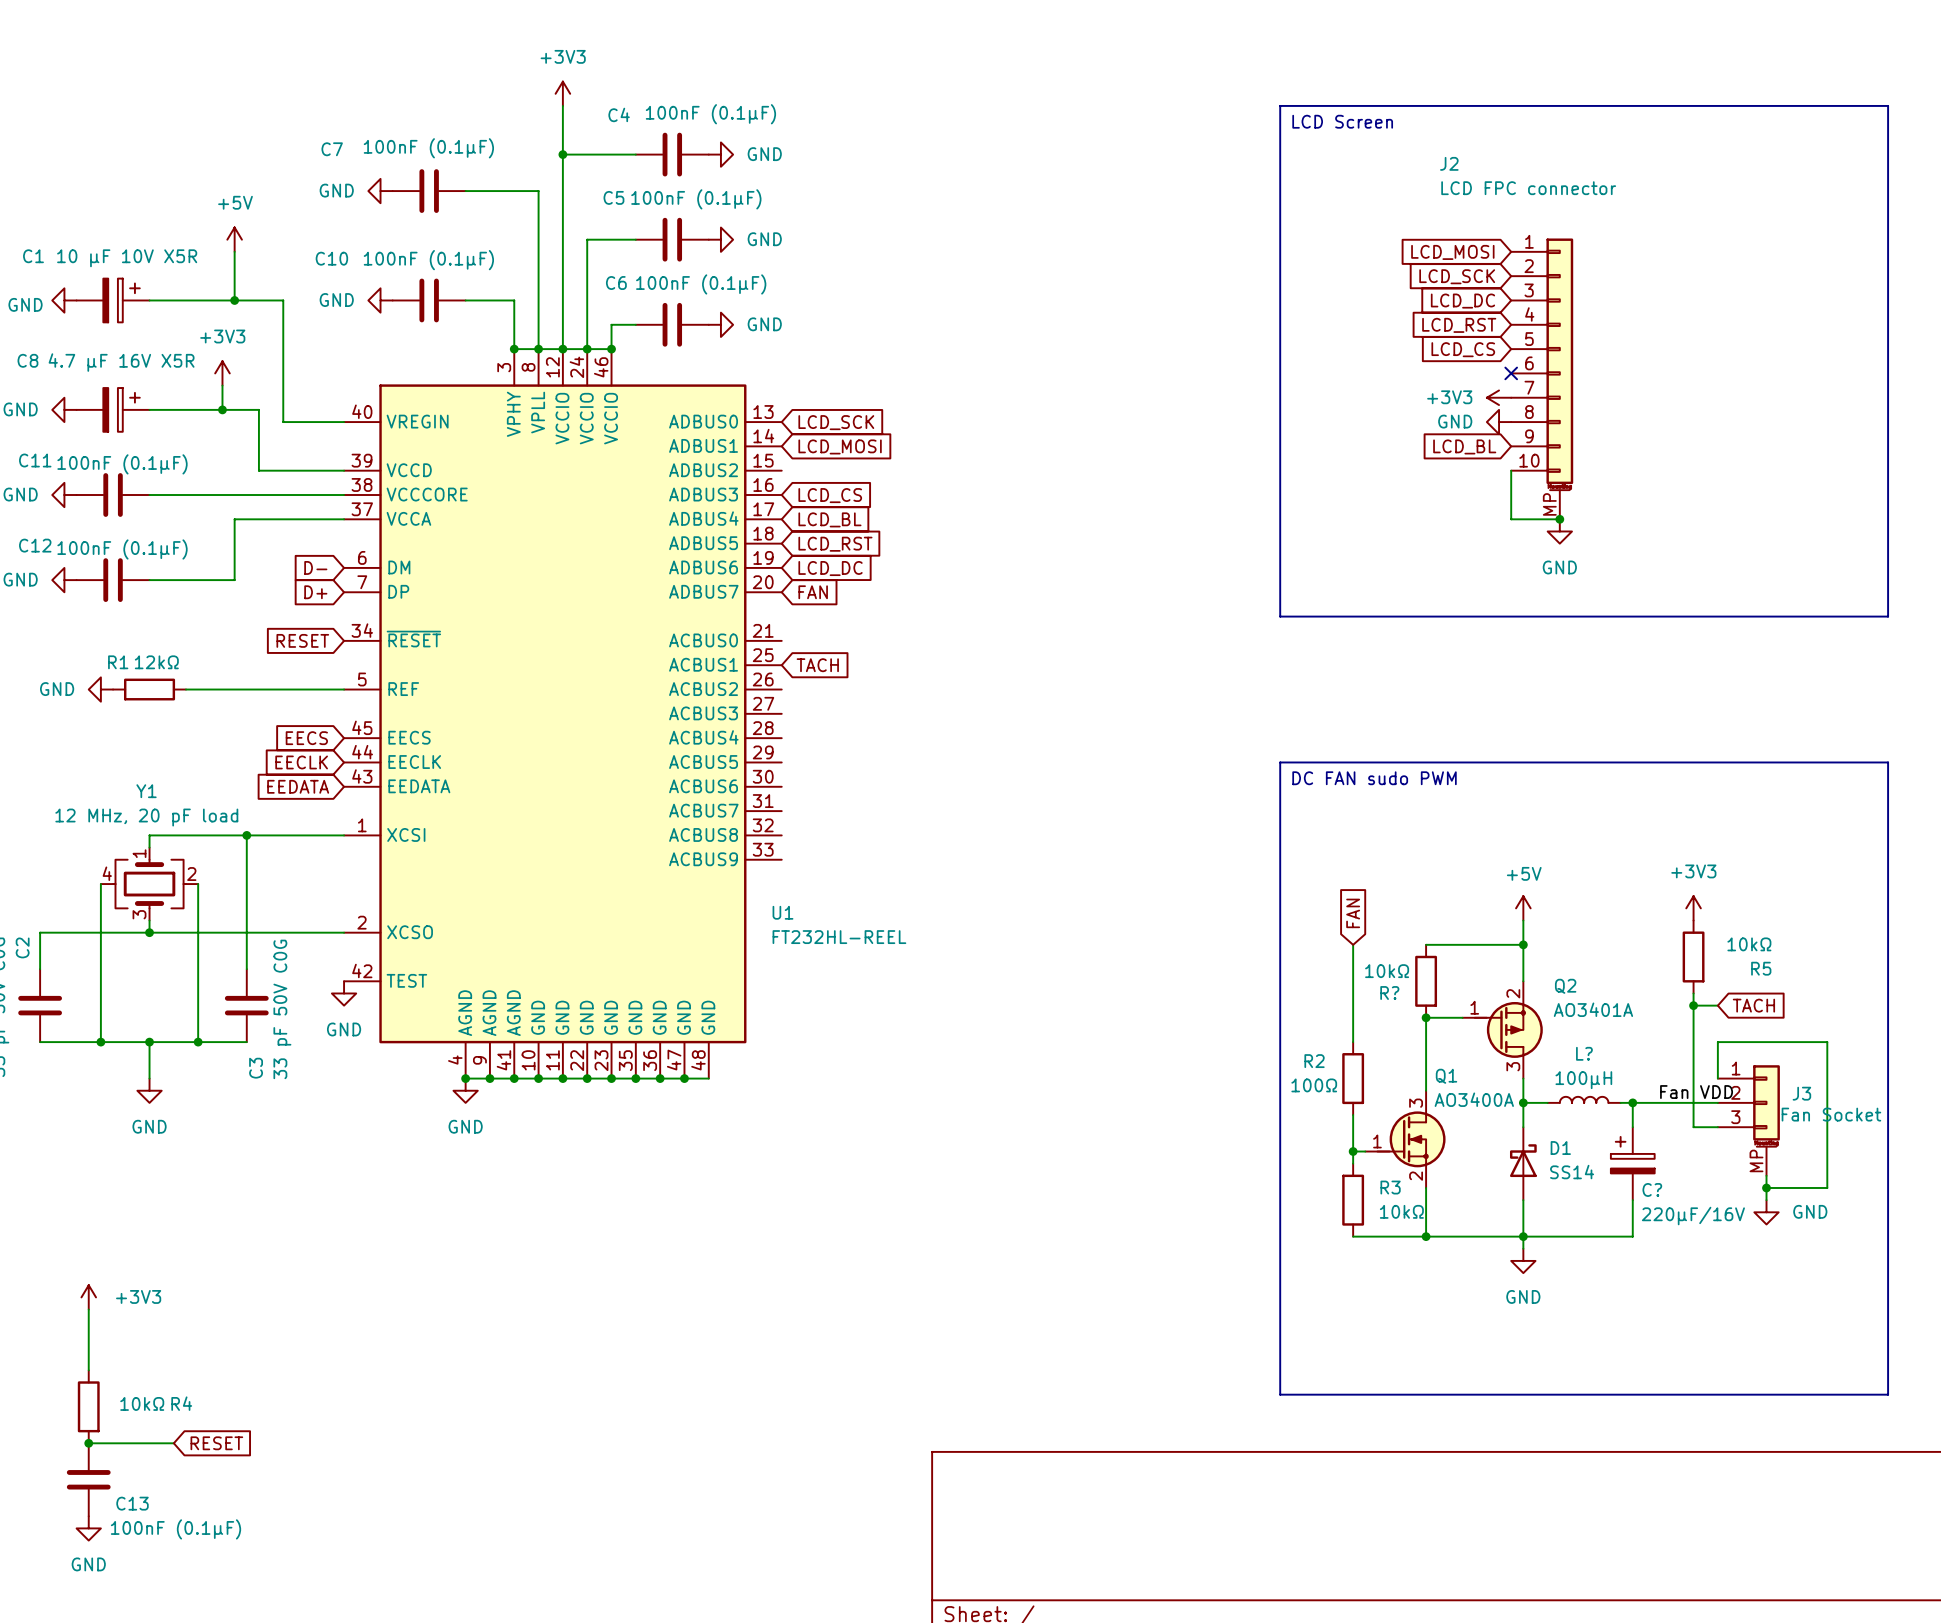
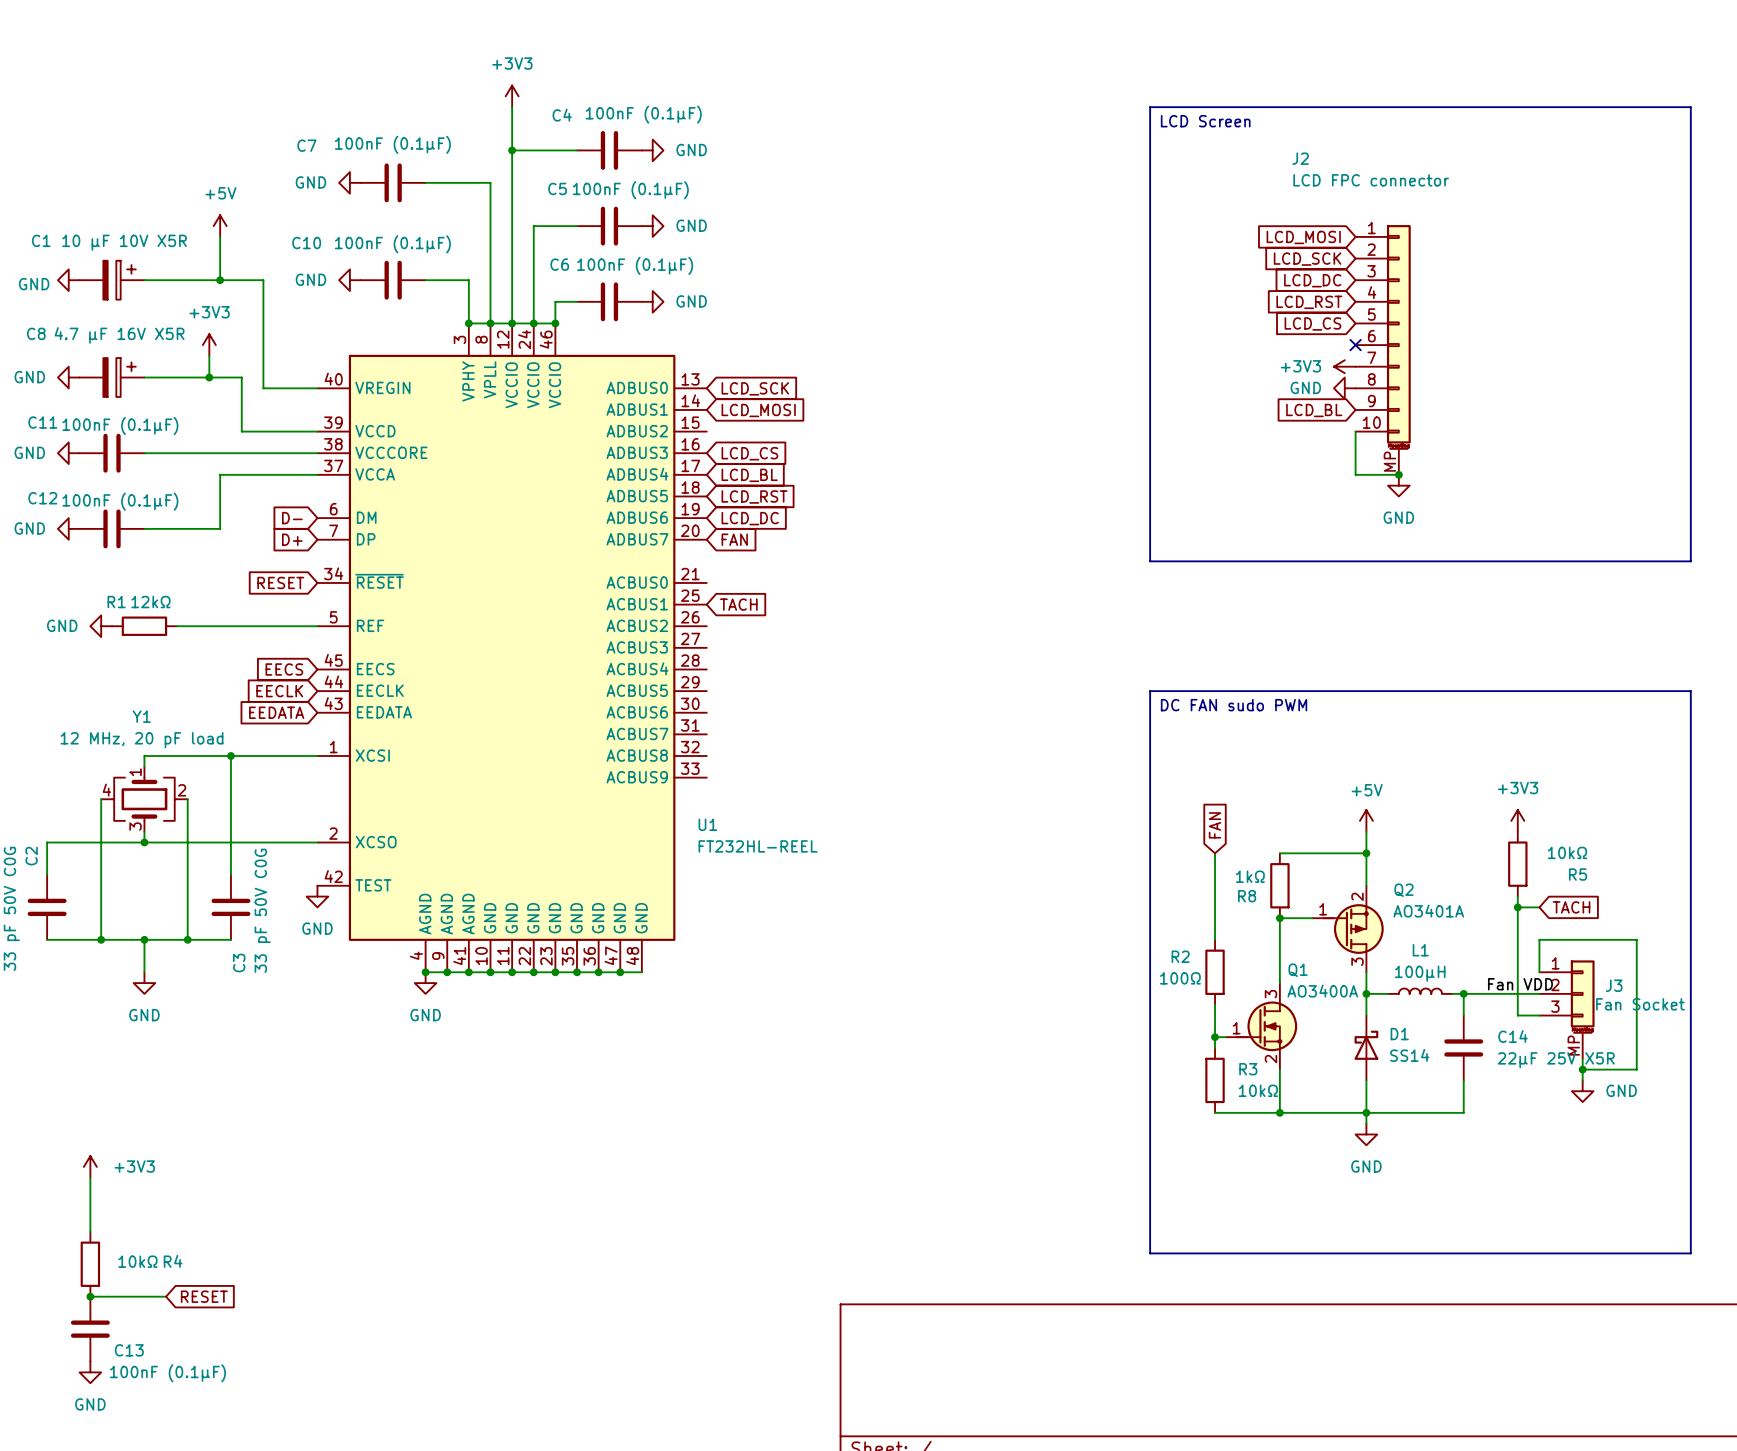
R? value: 10kΩ (1387, 971) -> 1kΩ (1250, 876)
R? name: R? (1389, 993) -> R8 (1247, 896)
L? name: L? (1584, 1053) -> L1 (1420, 950)
C?: 220µF/16V (1632, 1163) -> none
C14: none -> 22µF 25V X5R (1463, 1047)

